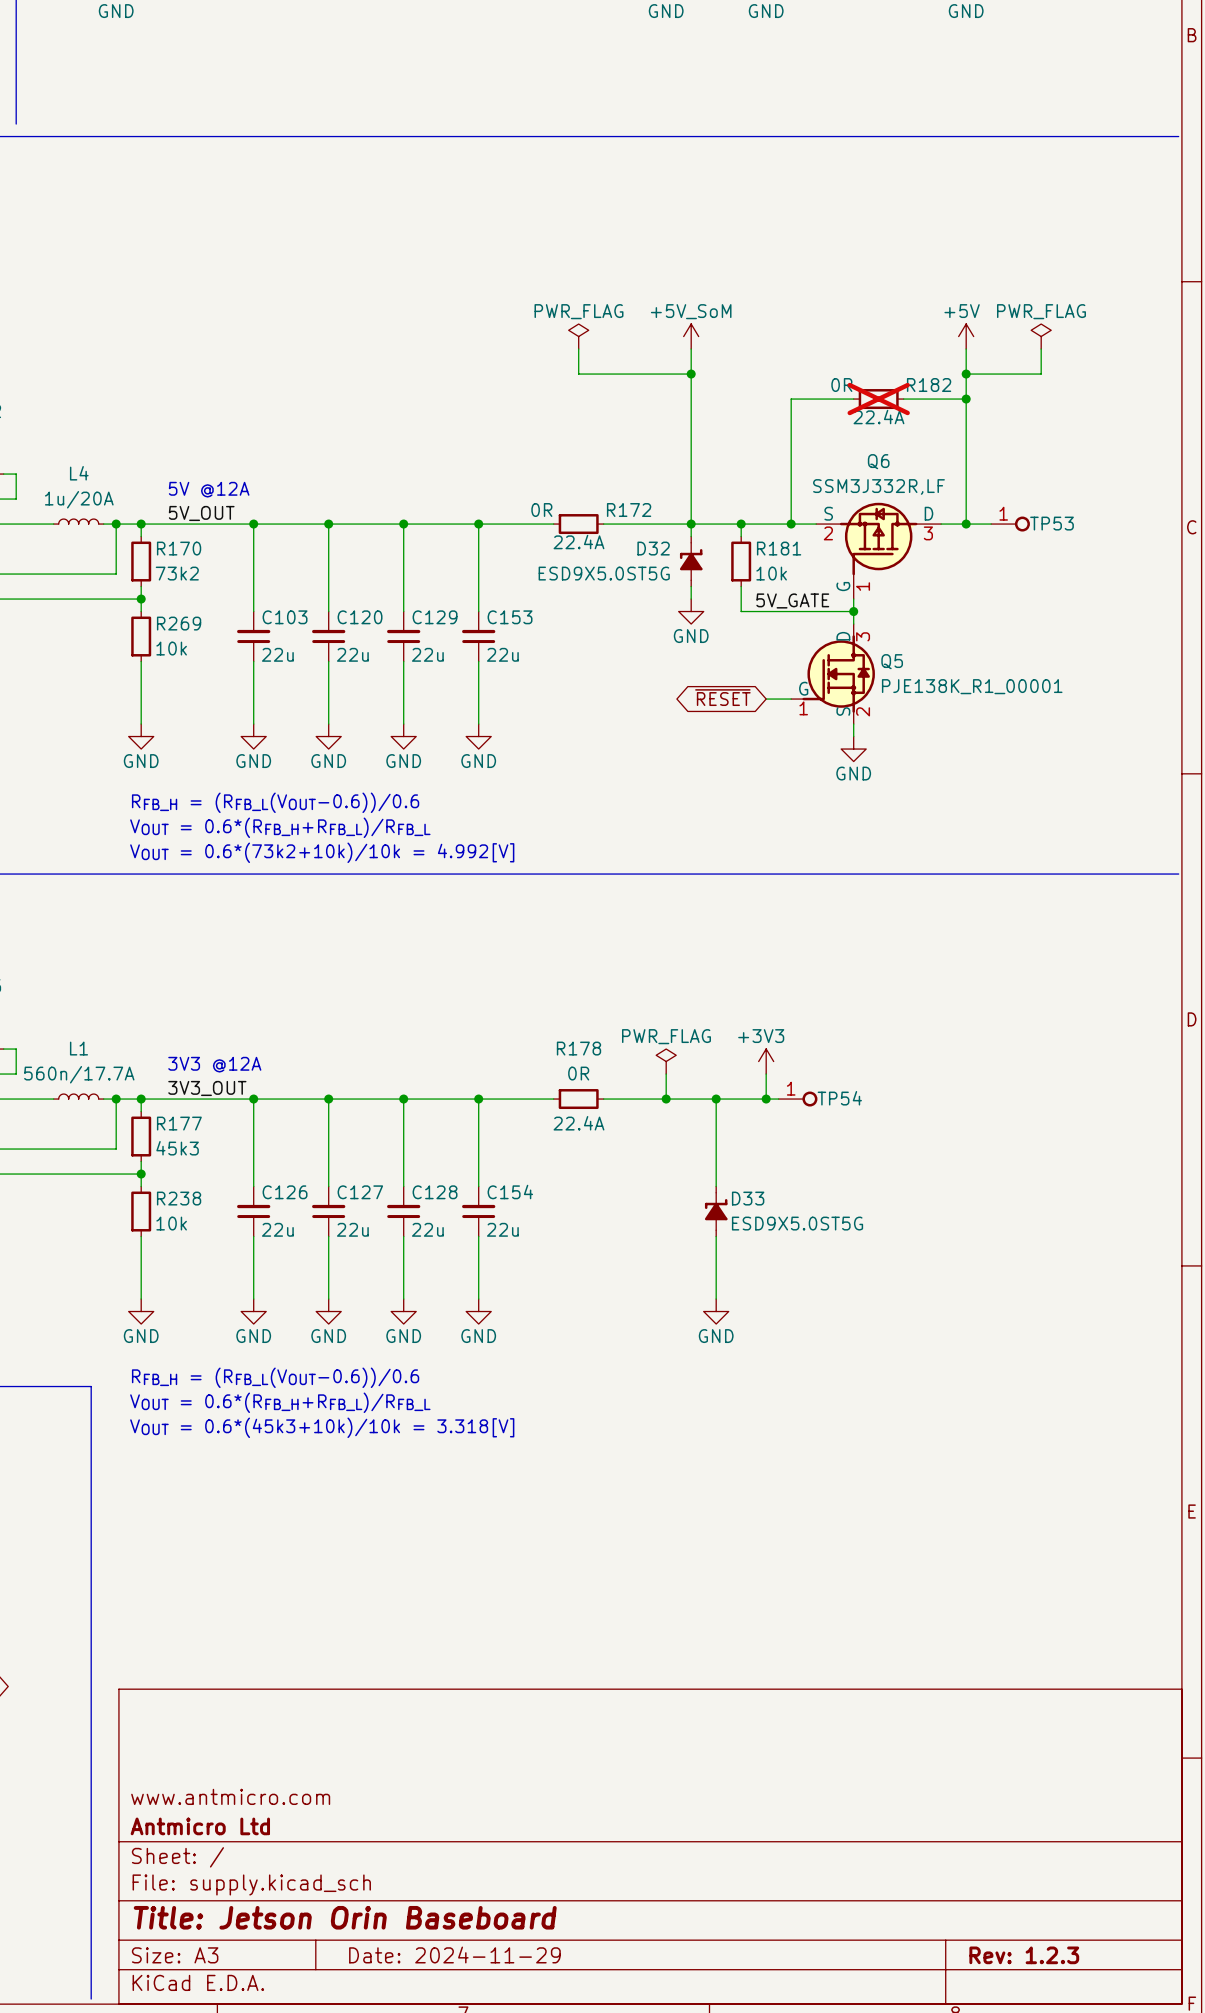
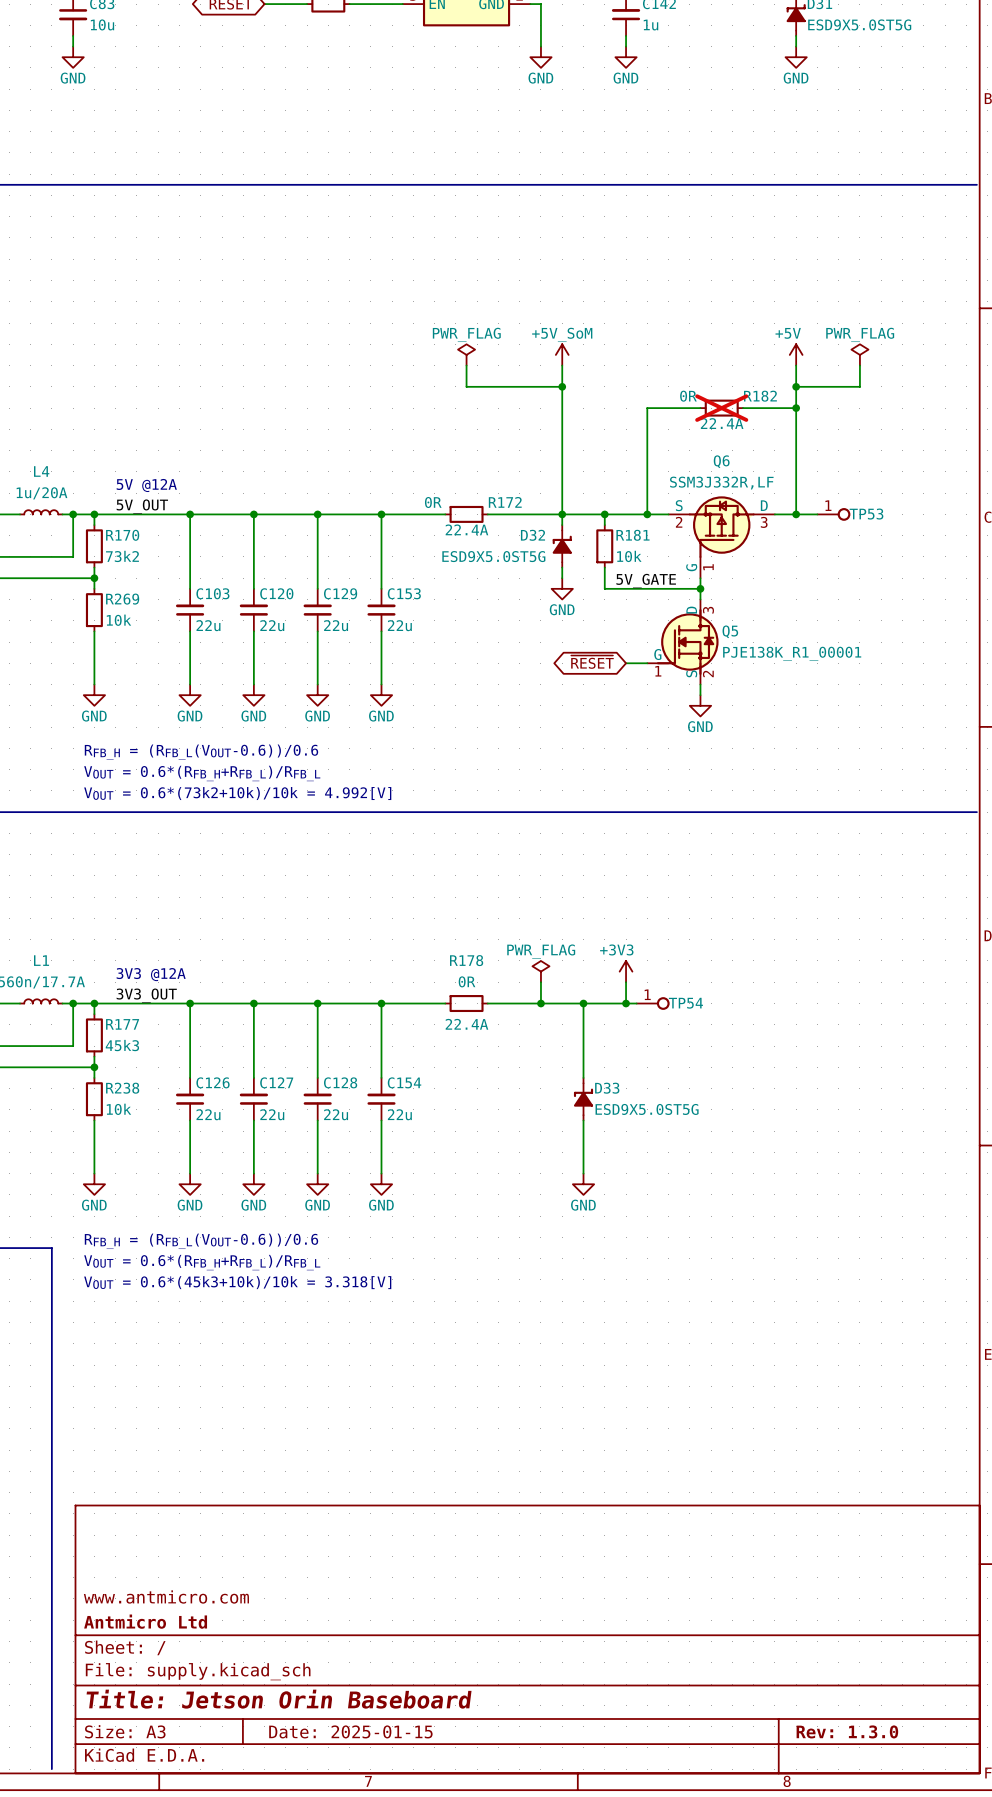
title block: Date: 2024-11-29 (454, 1955) -> Date: 2025-01-15 (350, 1731)
title block: Rev: 1.2.3 (1024, 1955) -> Rev: 1.3.0 (847, 1731)

